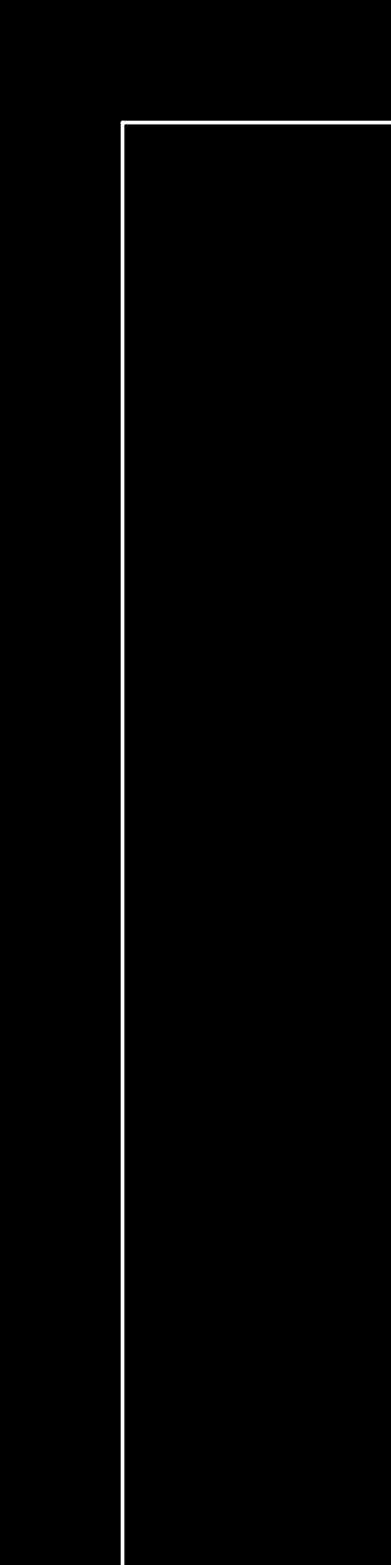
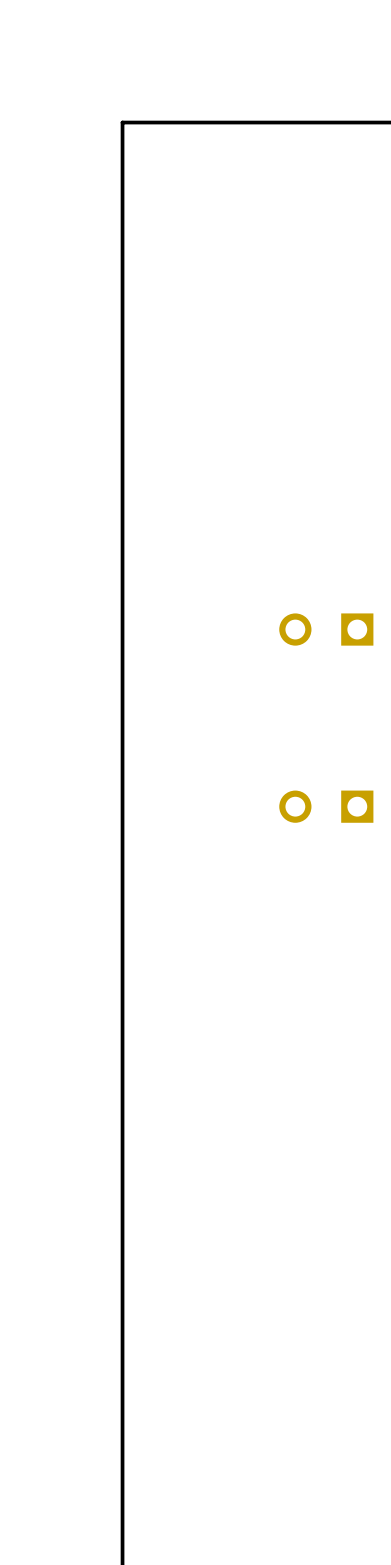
part: none -> (326, 629)
part: none -> (326, 806)

